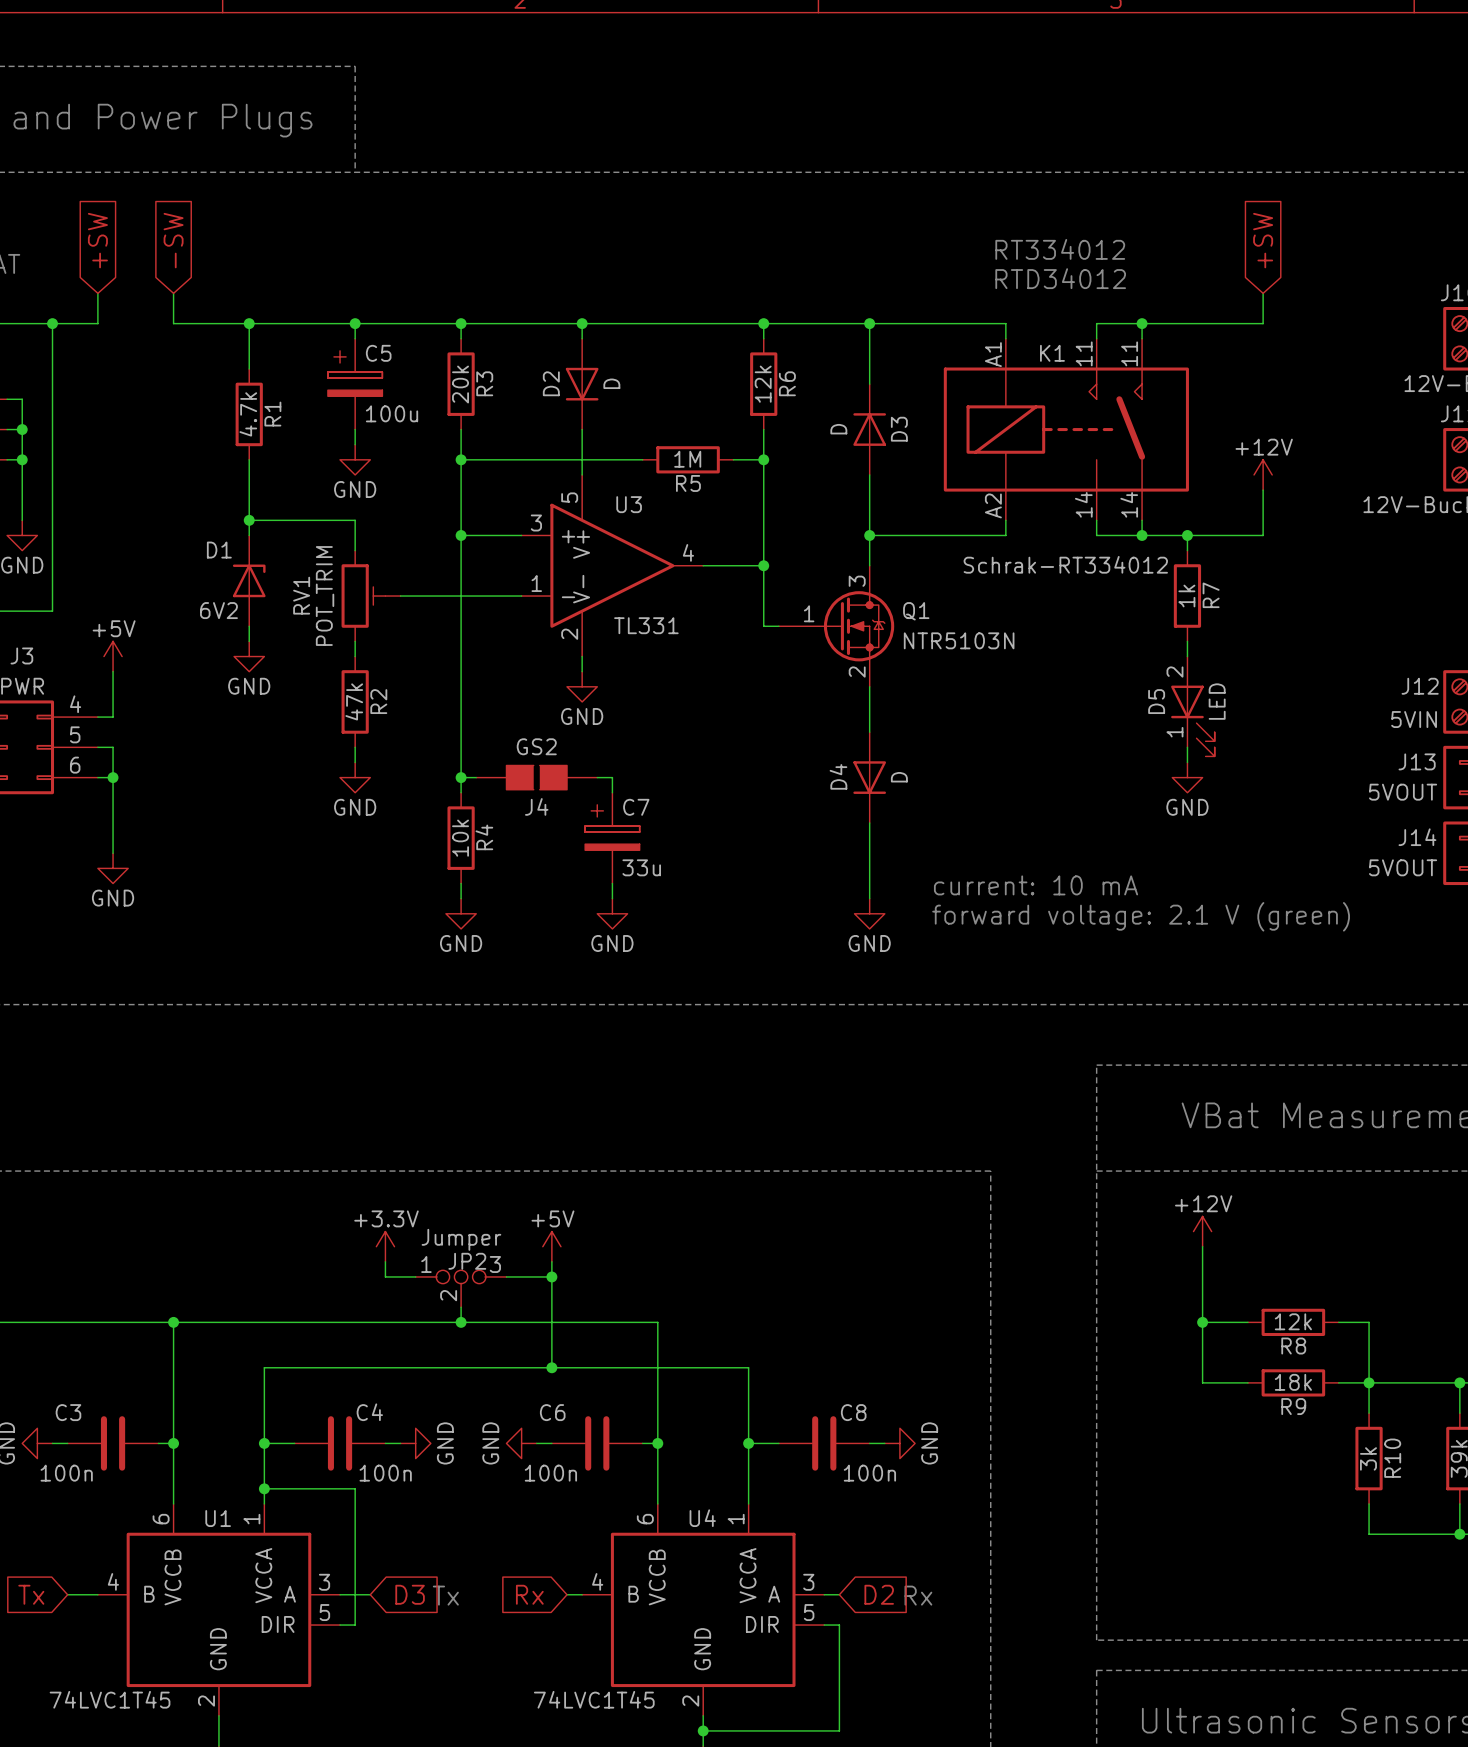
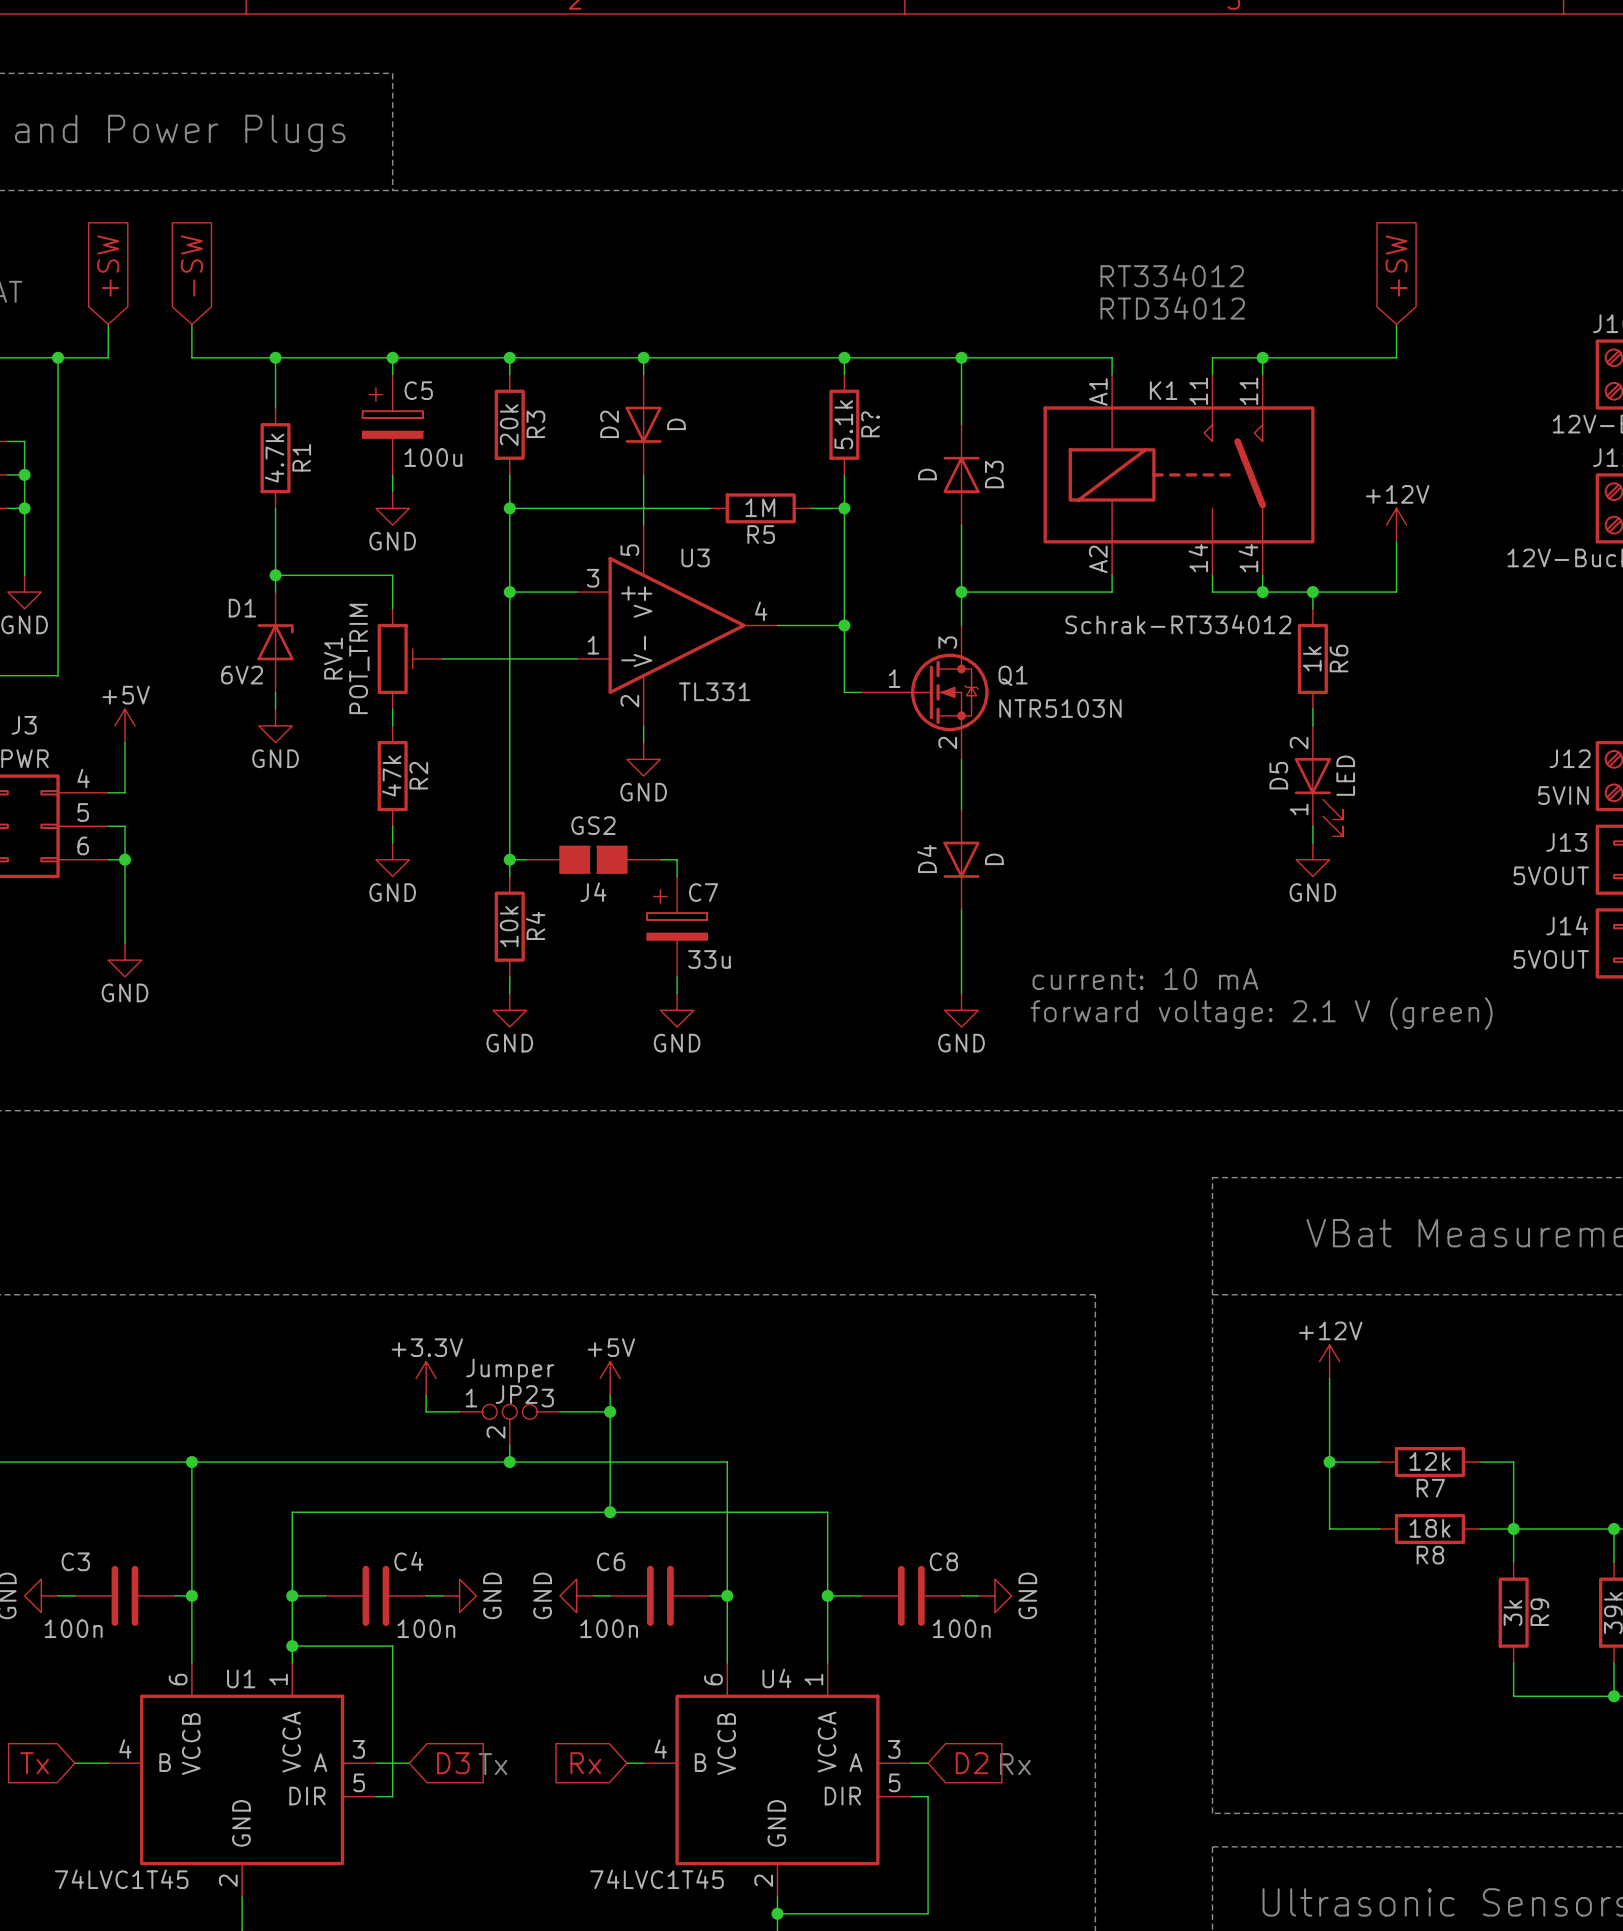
R6 name: R6 (787, 383) -> R? (870, 424)
R6 value: 12k (763, 384) -> 5.1k (843, 424)
R7 name: R7 (1211, 595) -> R6 (1339, 658)
R8 name: R8 (1293, 1346) -> R7 (1430, 1488)
R9 name: R9 (1293, 1406) -> R8 (1430, 1555)
R10 name: R10 (1392, 1458) -> R9 (1539, 1612)

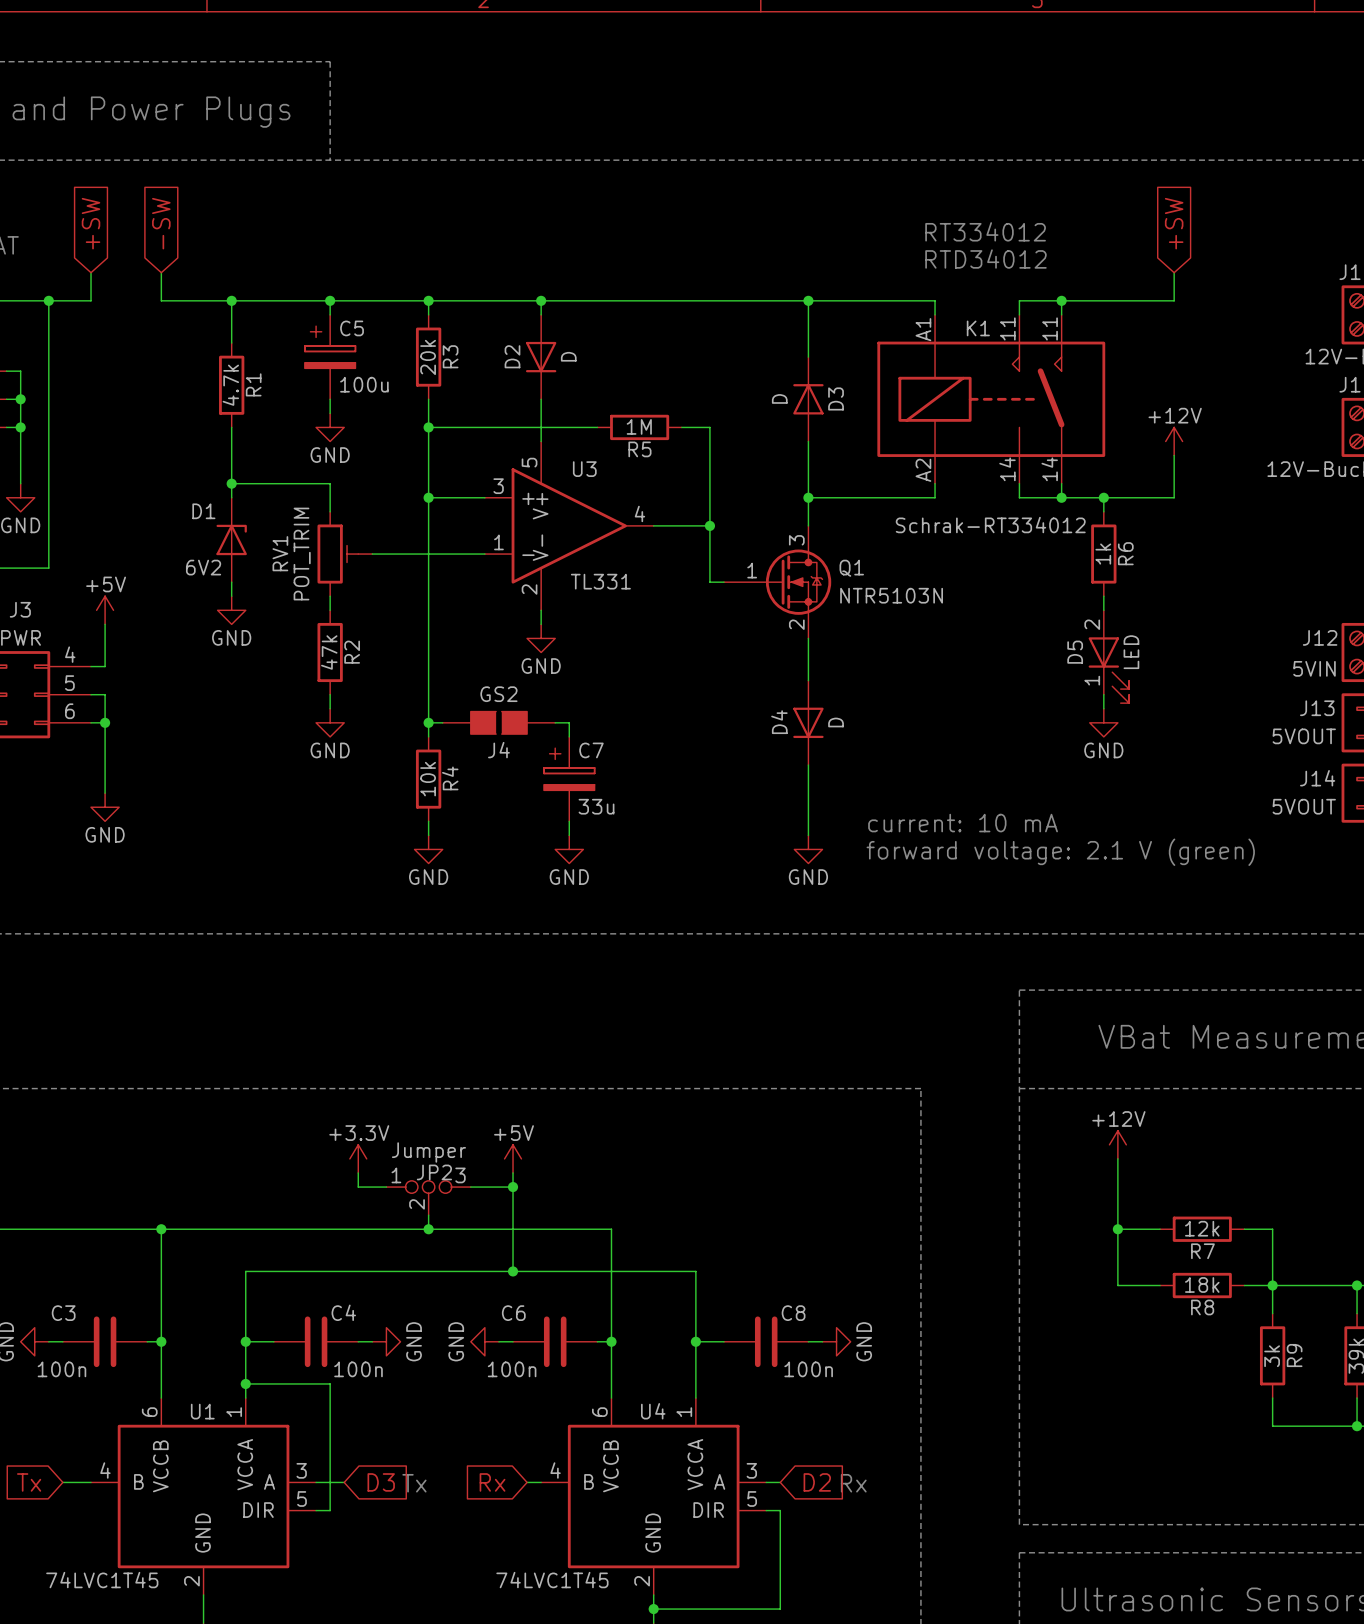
wire: (844, 357) (844, 374) -> none
junction: (844, 357) -> none
R?: 5.1k (844, 424) -> none
wire: (844, 474) (844, 508) -> none
junction: (844, 508) -> none

